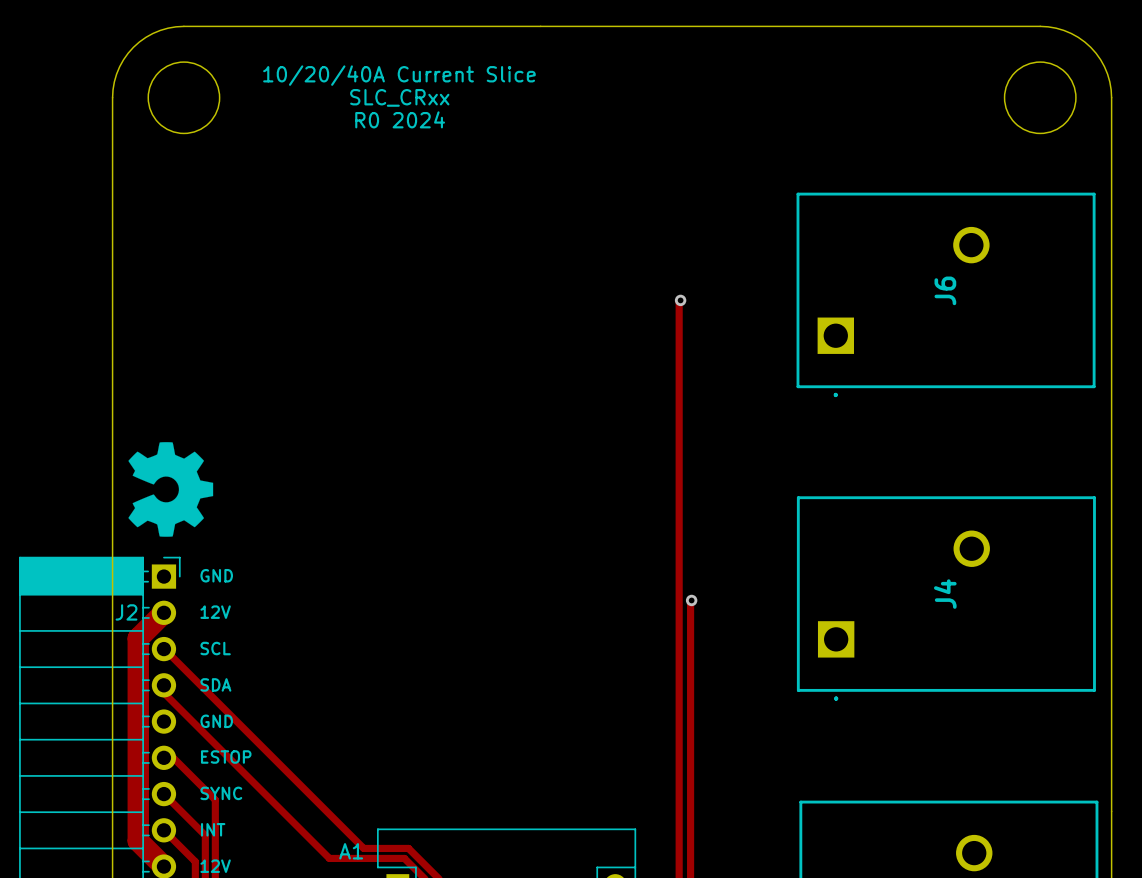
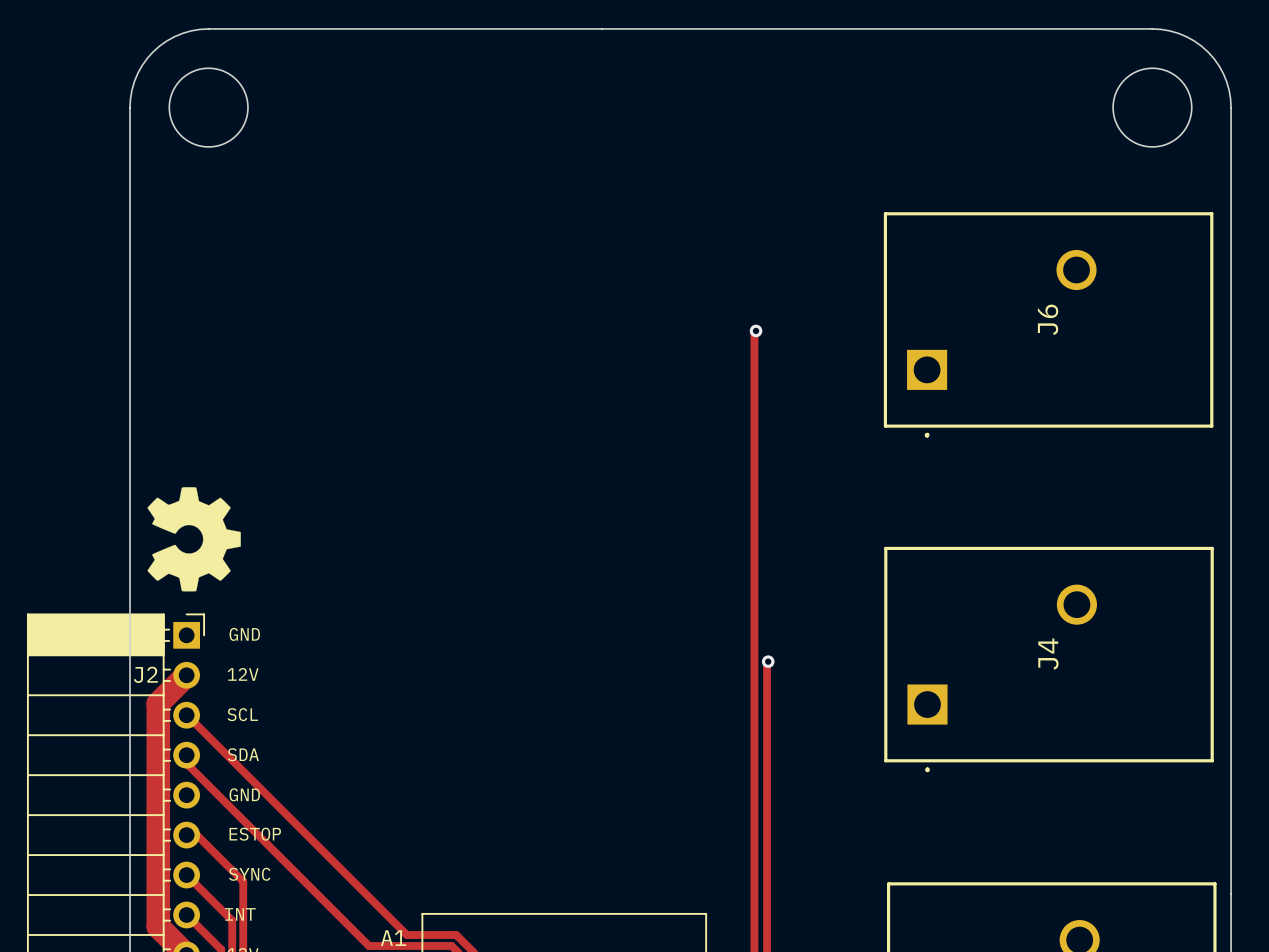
text: 10/20/40A Current Slice (399, 75) -> none
text: SLC_CRxx (399, 97) -> none
text: R0 2024 (400, 119) -> none

